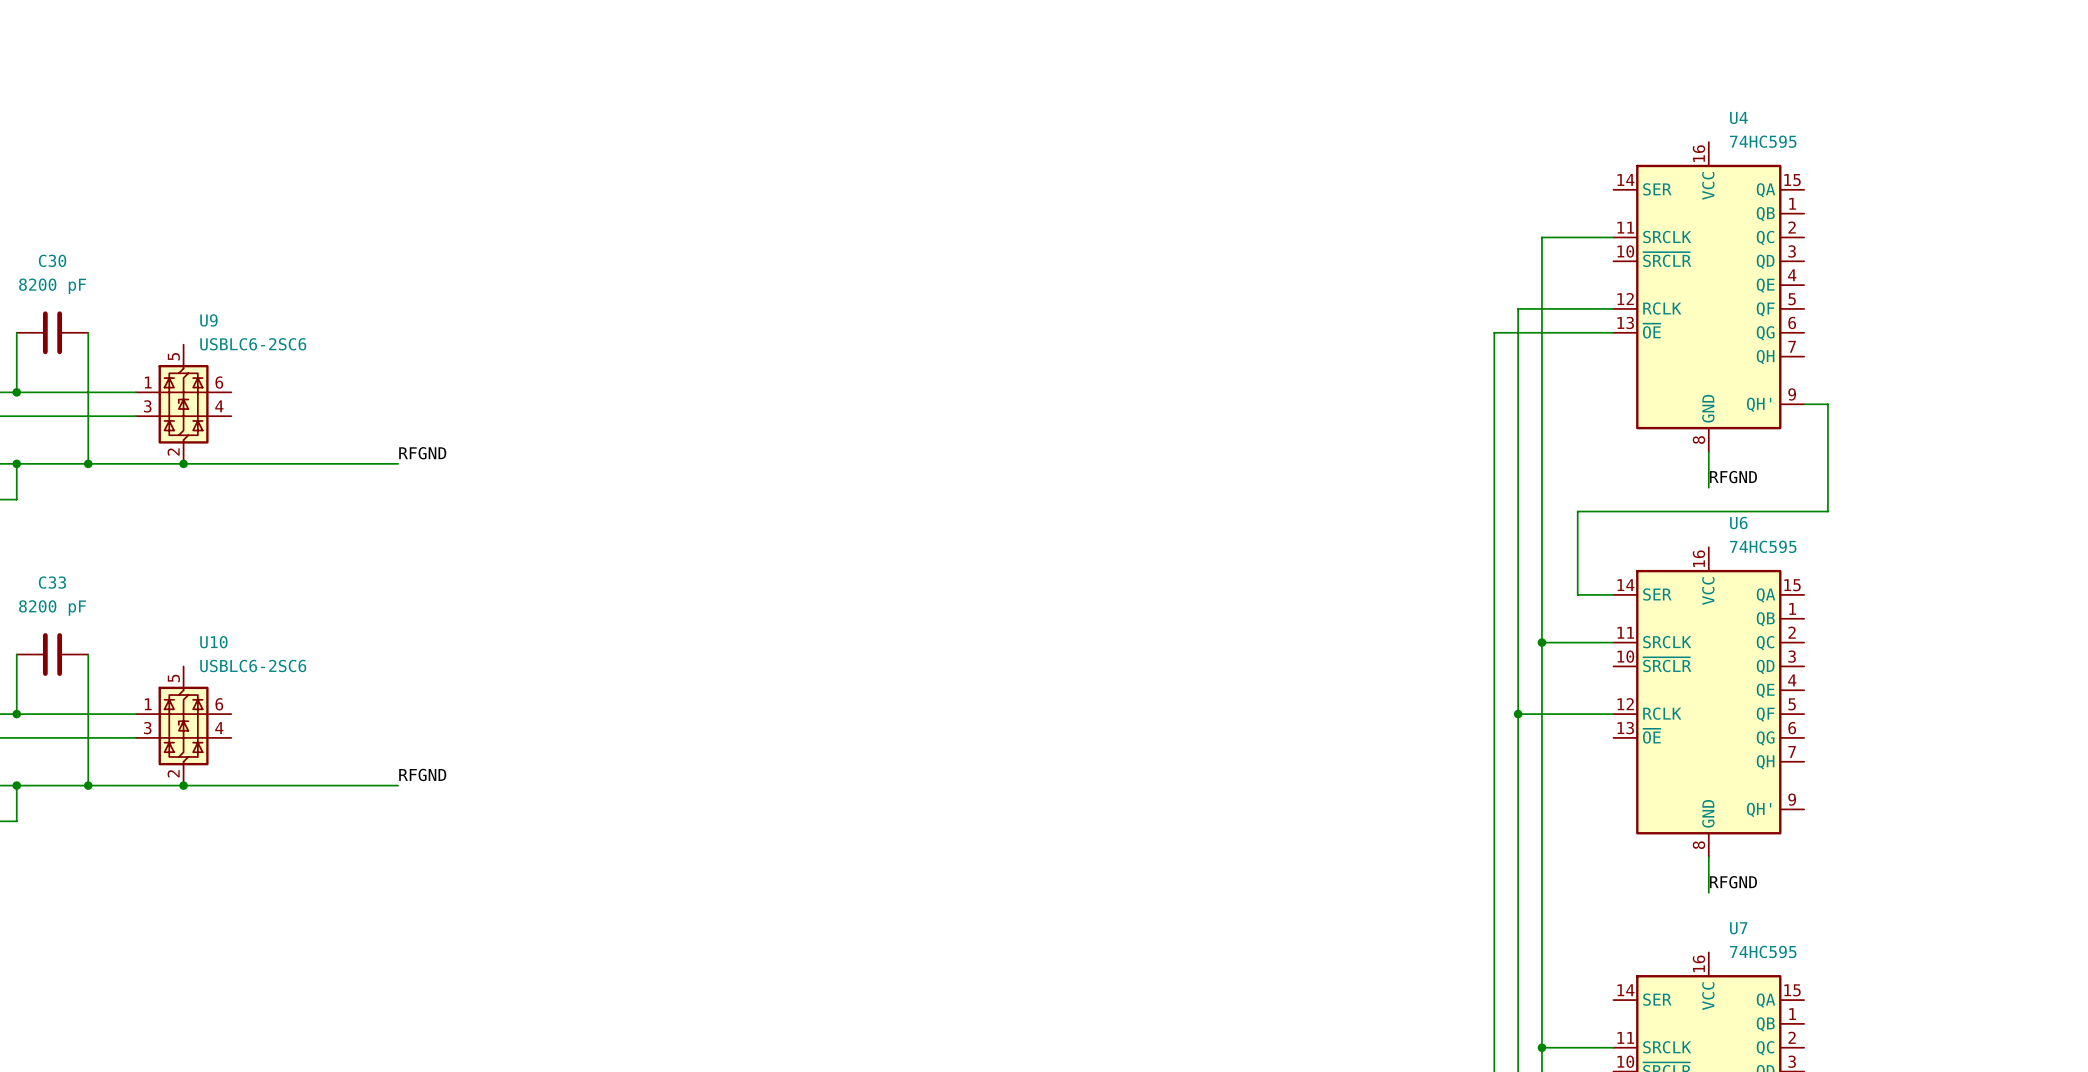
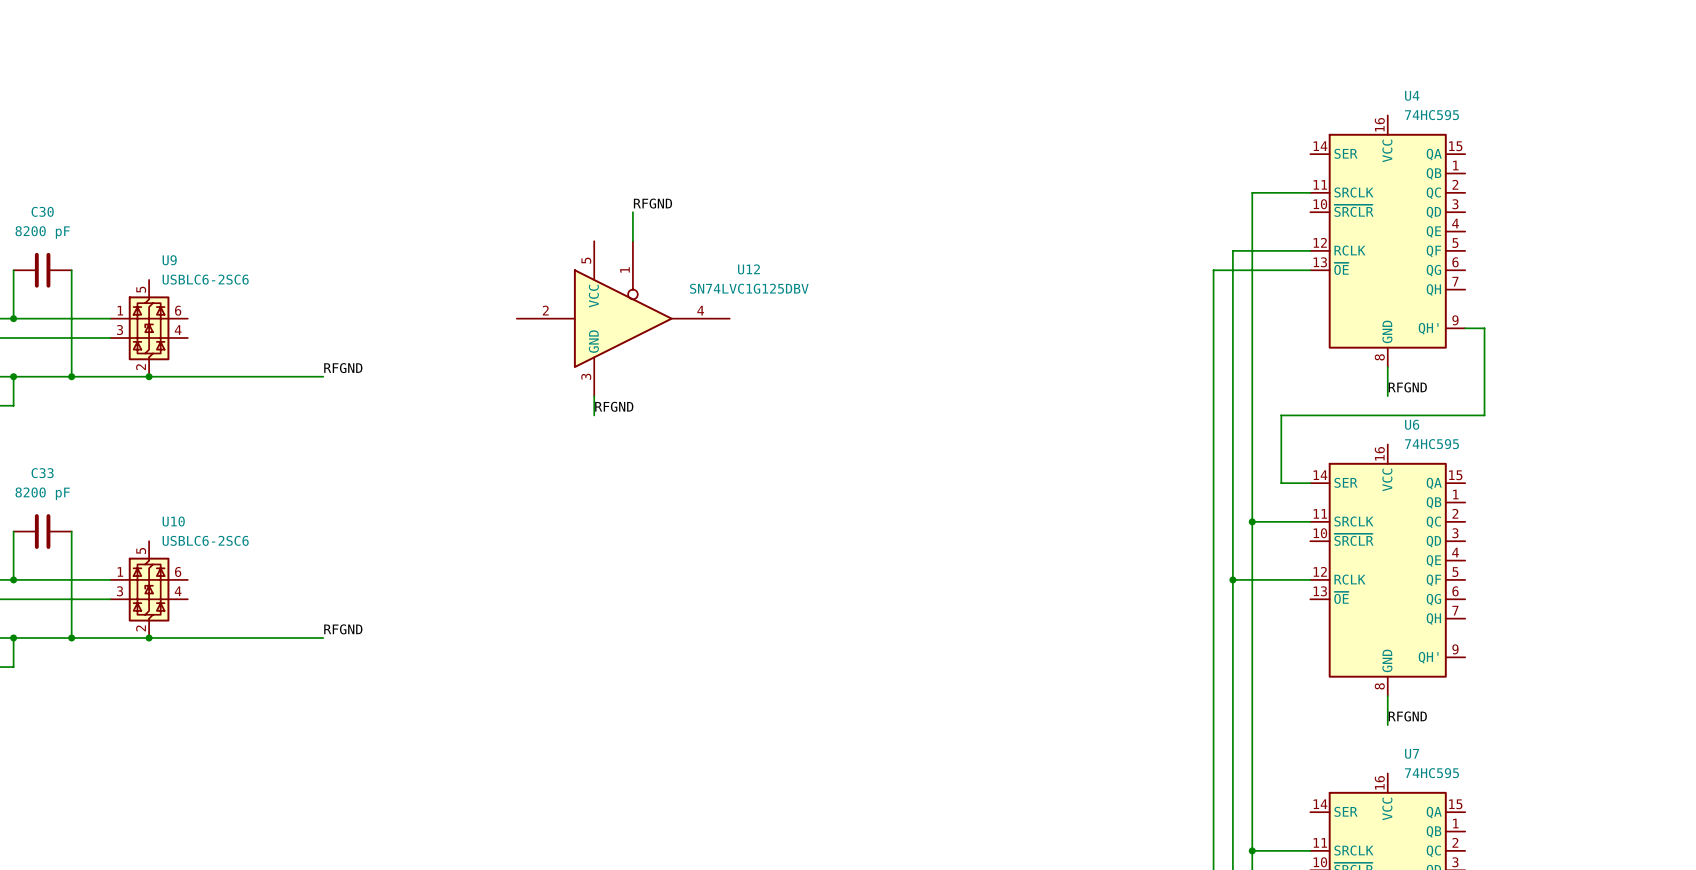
label: none -> RFGND (652, 203)
wire: none -> (632, 212) (632, 241)
U12: none -> SN74LVC1G125DBV (623, 318)
wire: none -> (594, 396) (594, 415)
label: none -> RFGND (614, 406)

